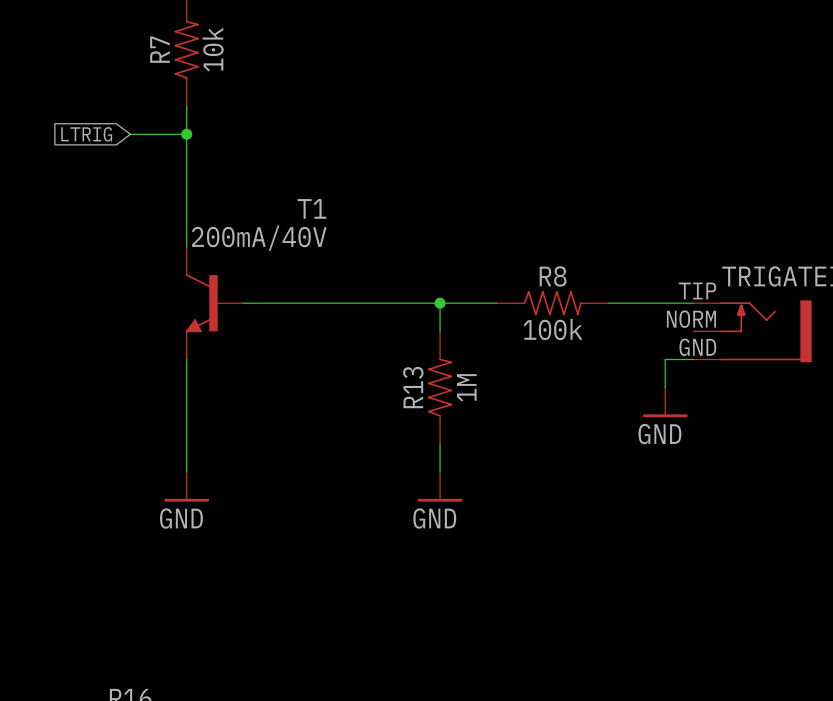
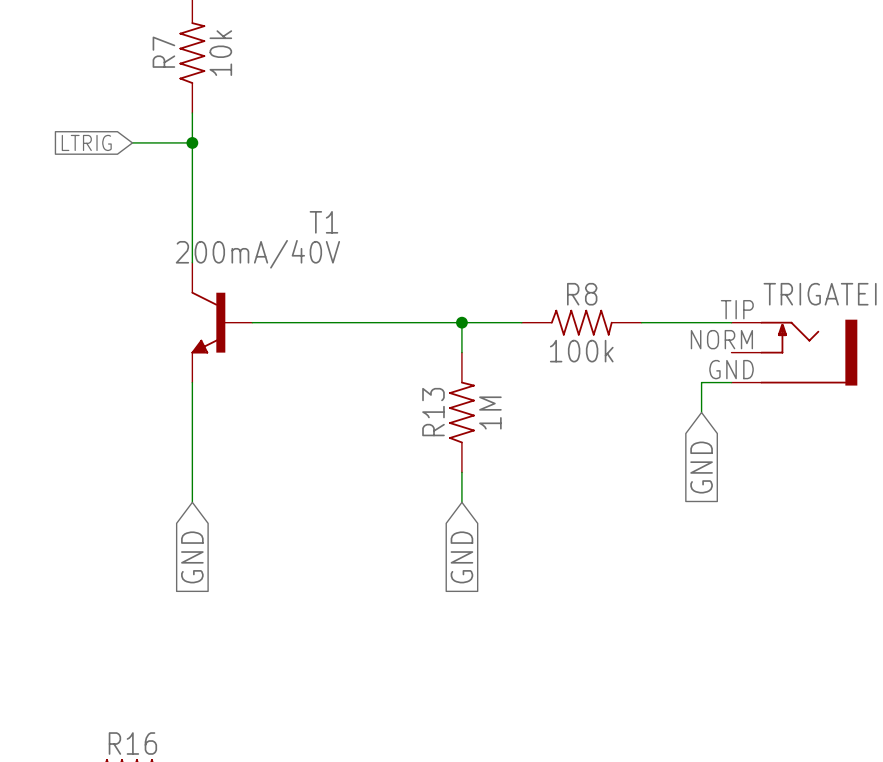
power symbol: GND (665, 402) -> none
global label: none -> GND (701, 467)
power symbol: GND (186, 486) -> none
power symbol: GND (440, 486) -> none
global label: none -> GND (192, 557)
global label: none -> GND (461, 557)

